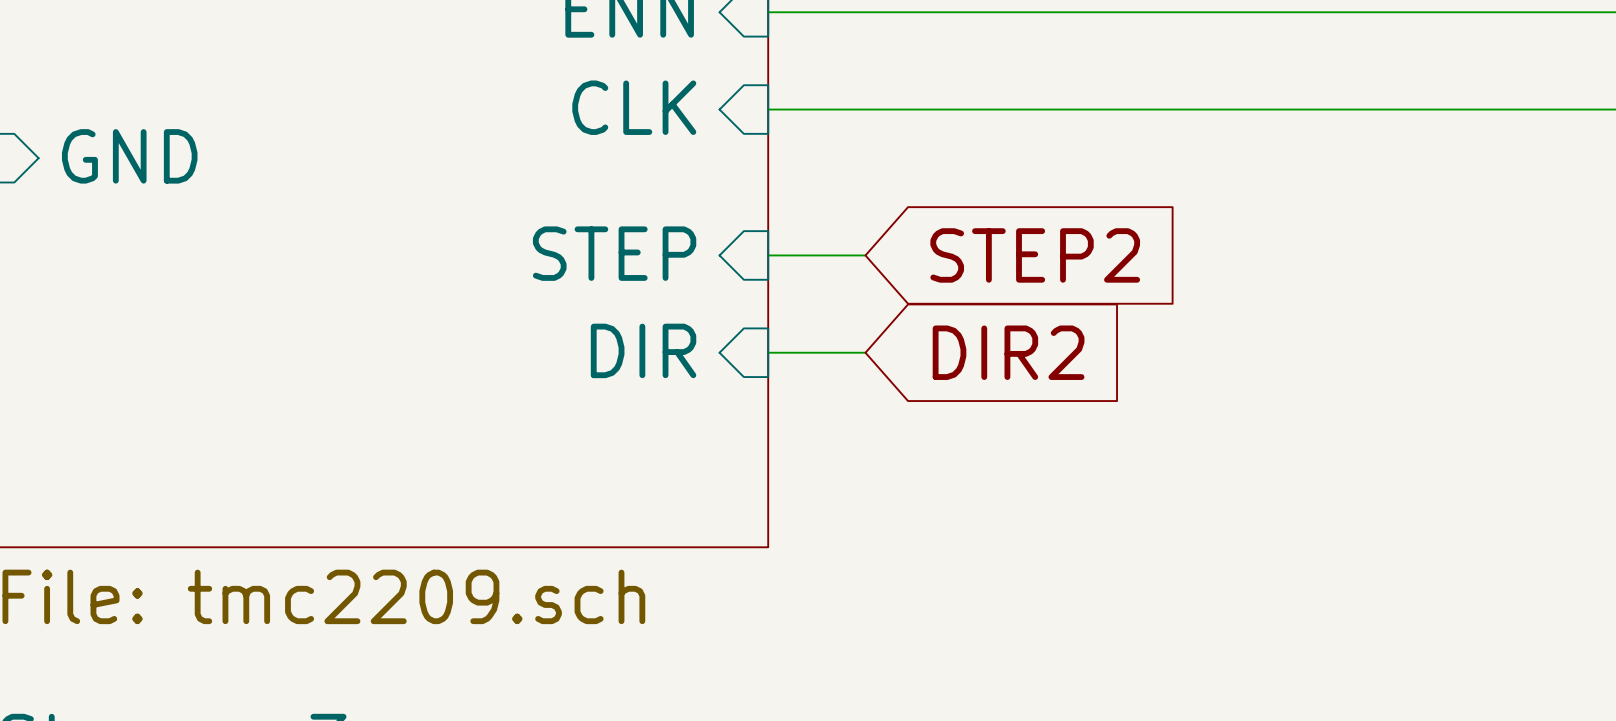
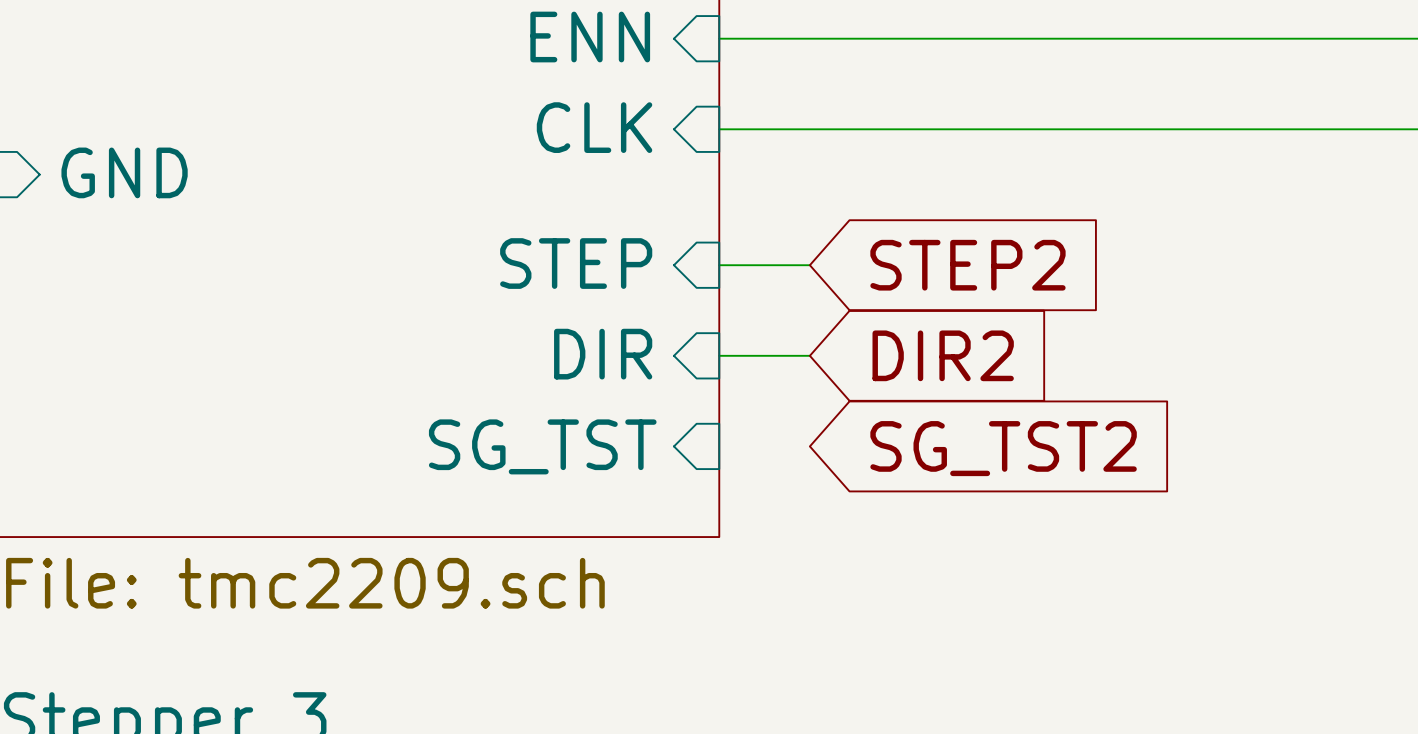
sheet pin: none -> SG_TST (542, 446)
global label: none -> SG_TST2 (1003, 448)

